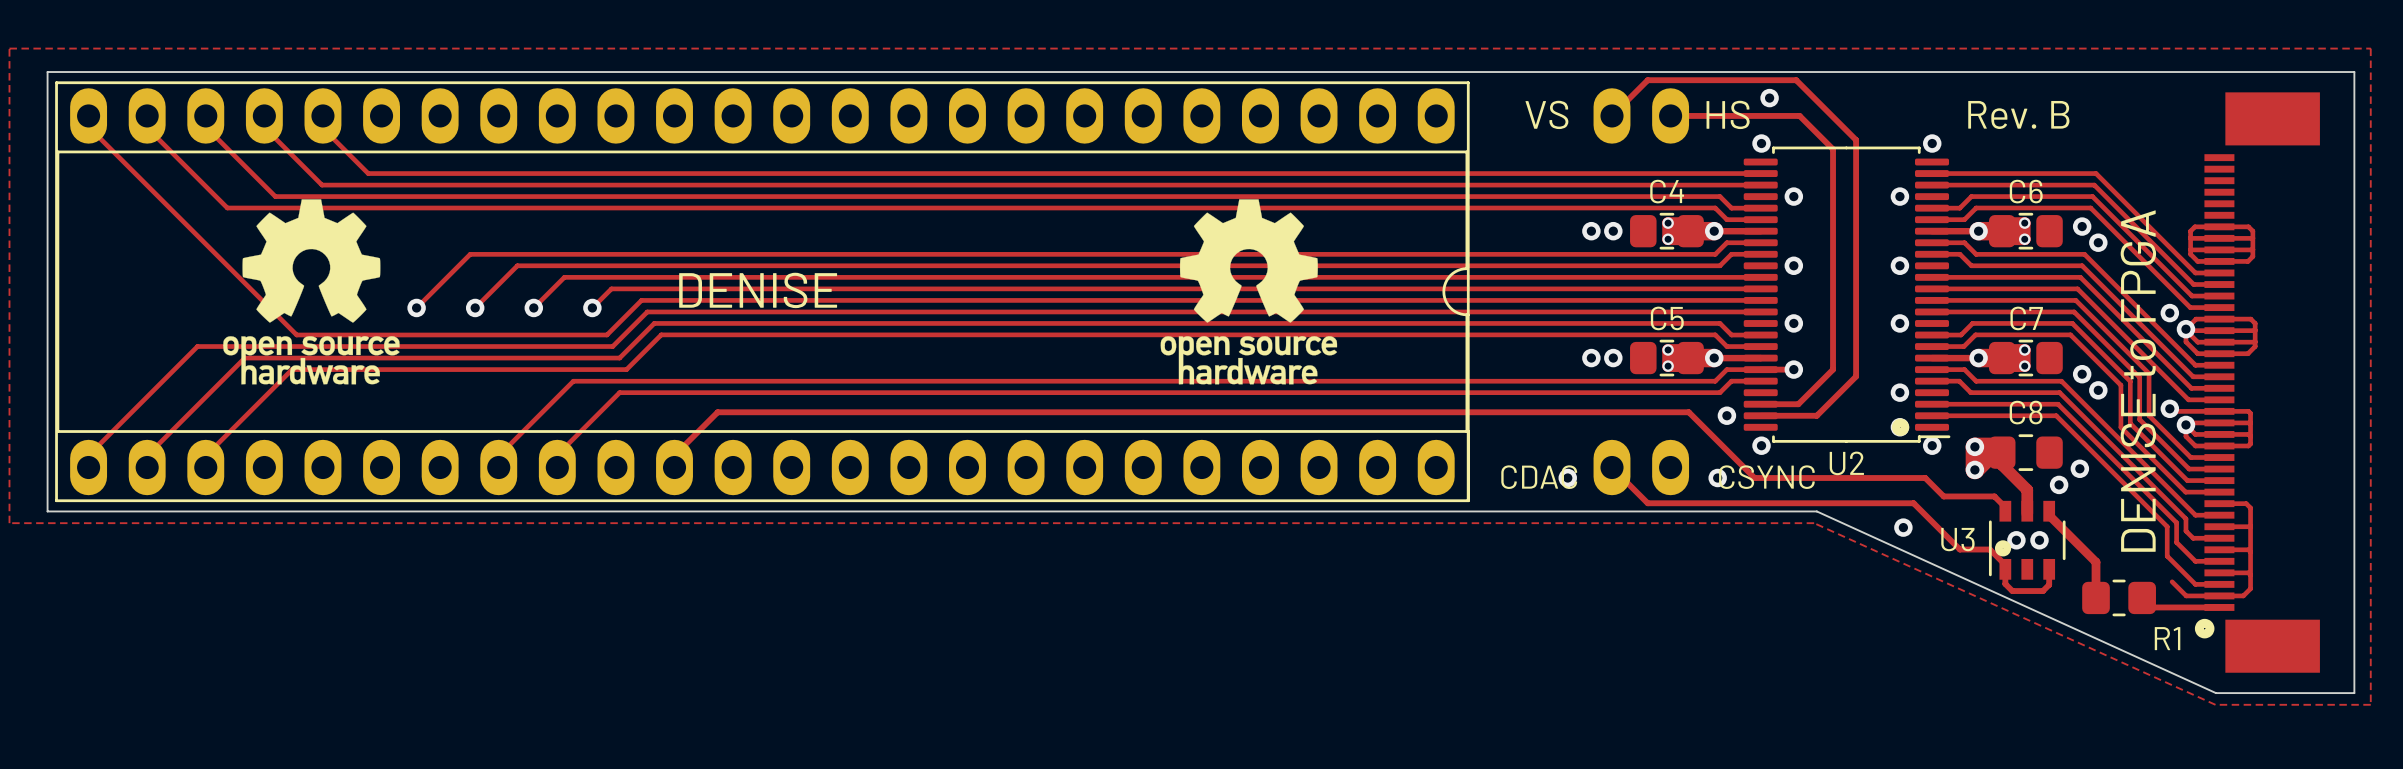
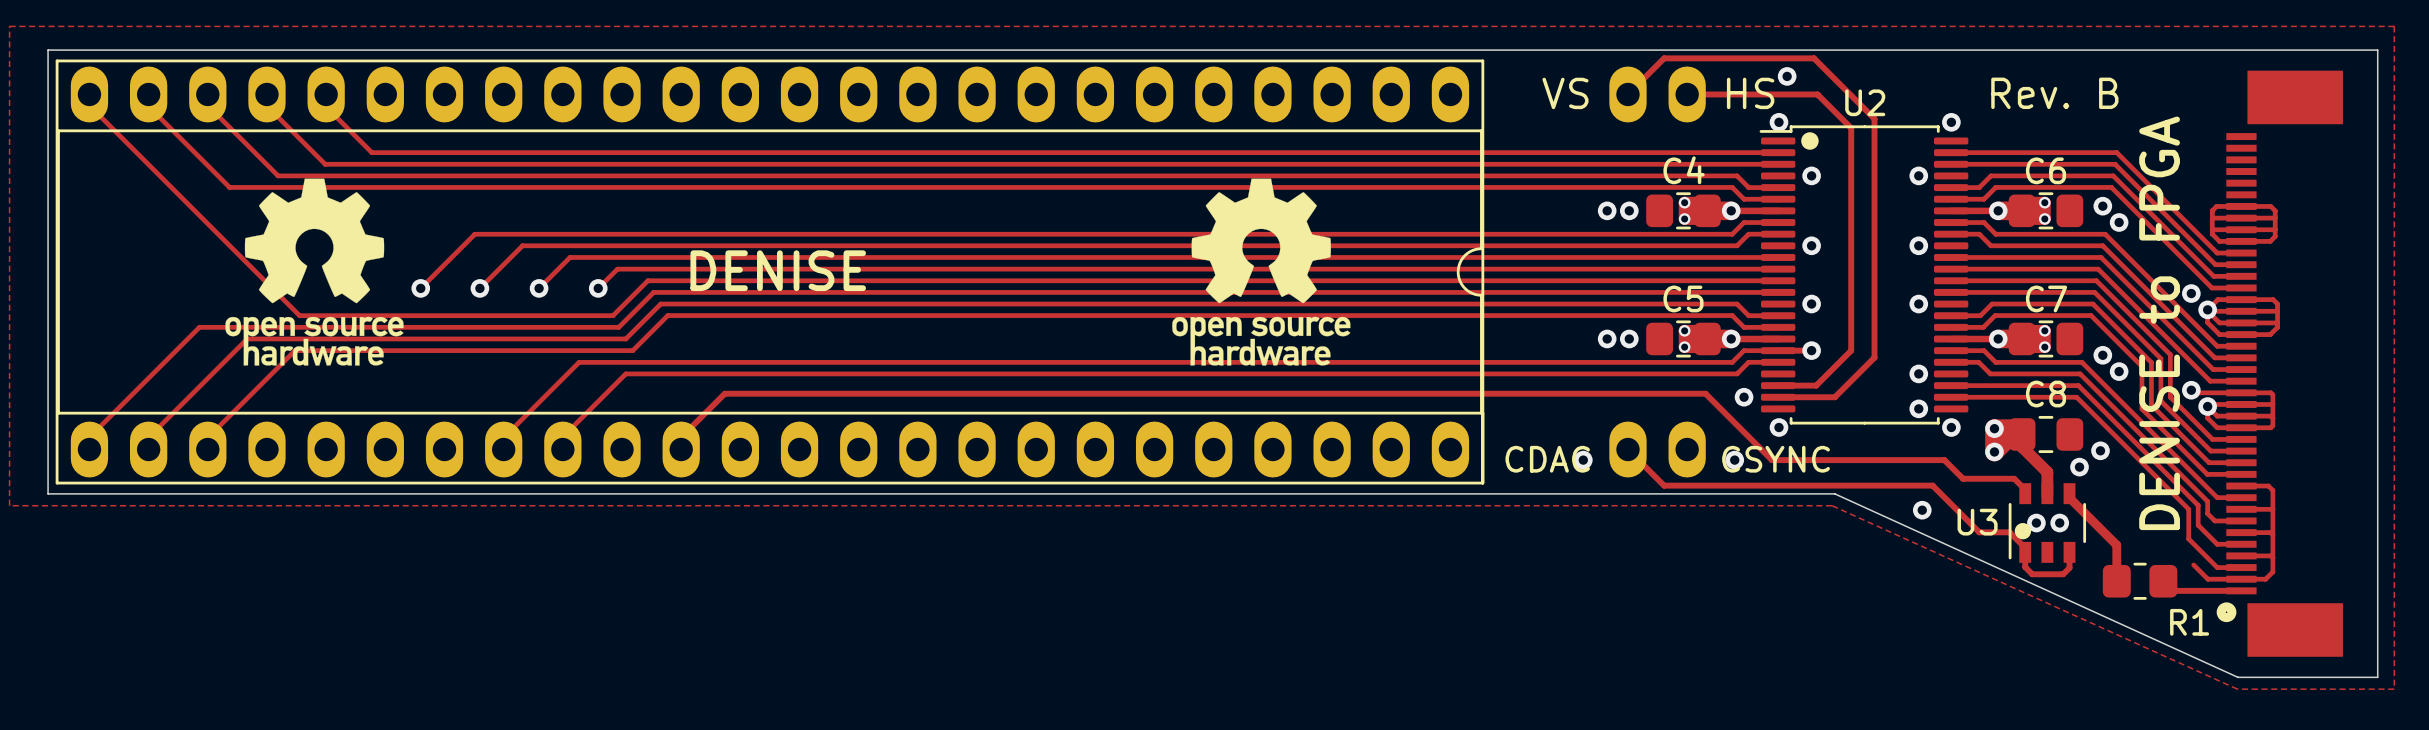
U2 rotation: 0° (1847, 294) -> 180° (1863, 274)

